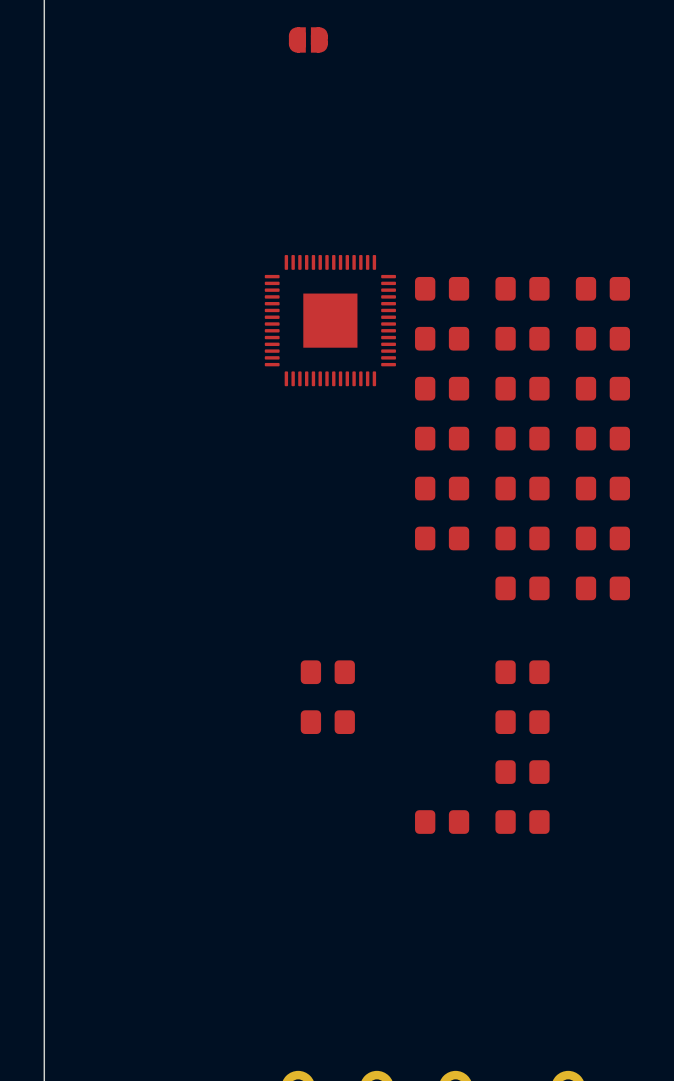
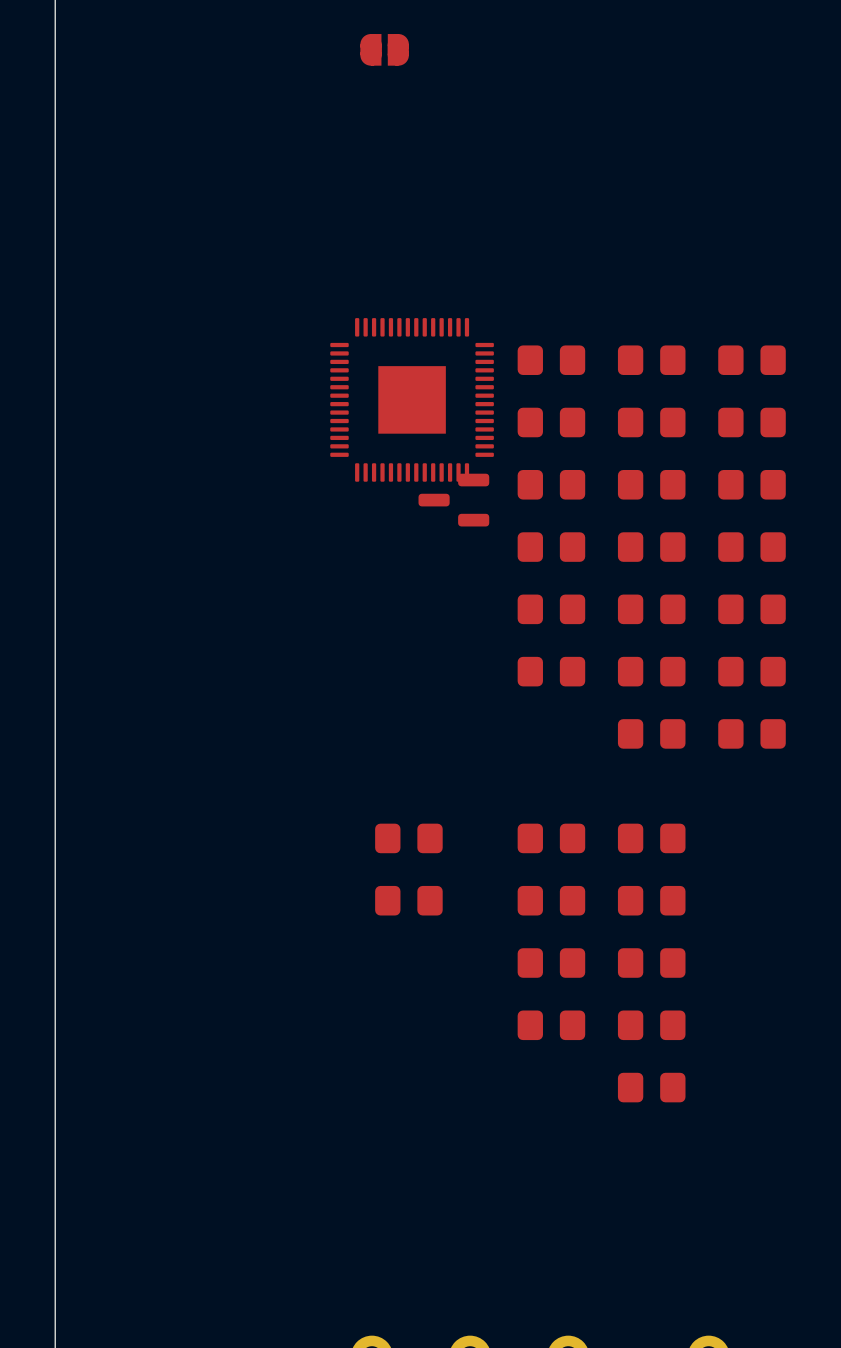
part: none -> (453, 500)
part: none -> (551, 838)
part: none -> (551, 900)
part: none -> (551, 963)
part: none -> (651, 1087)

